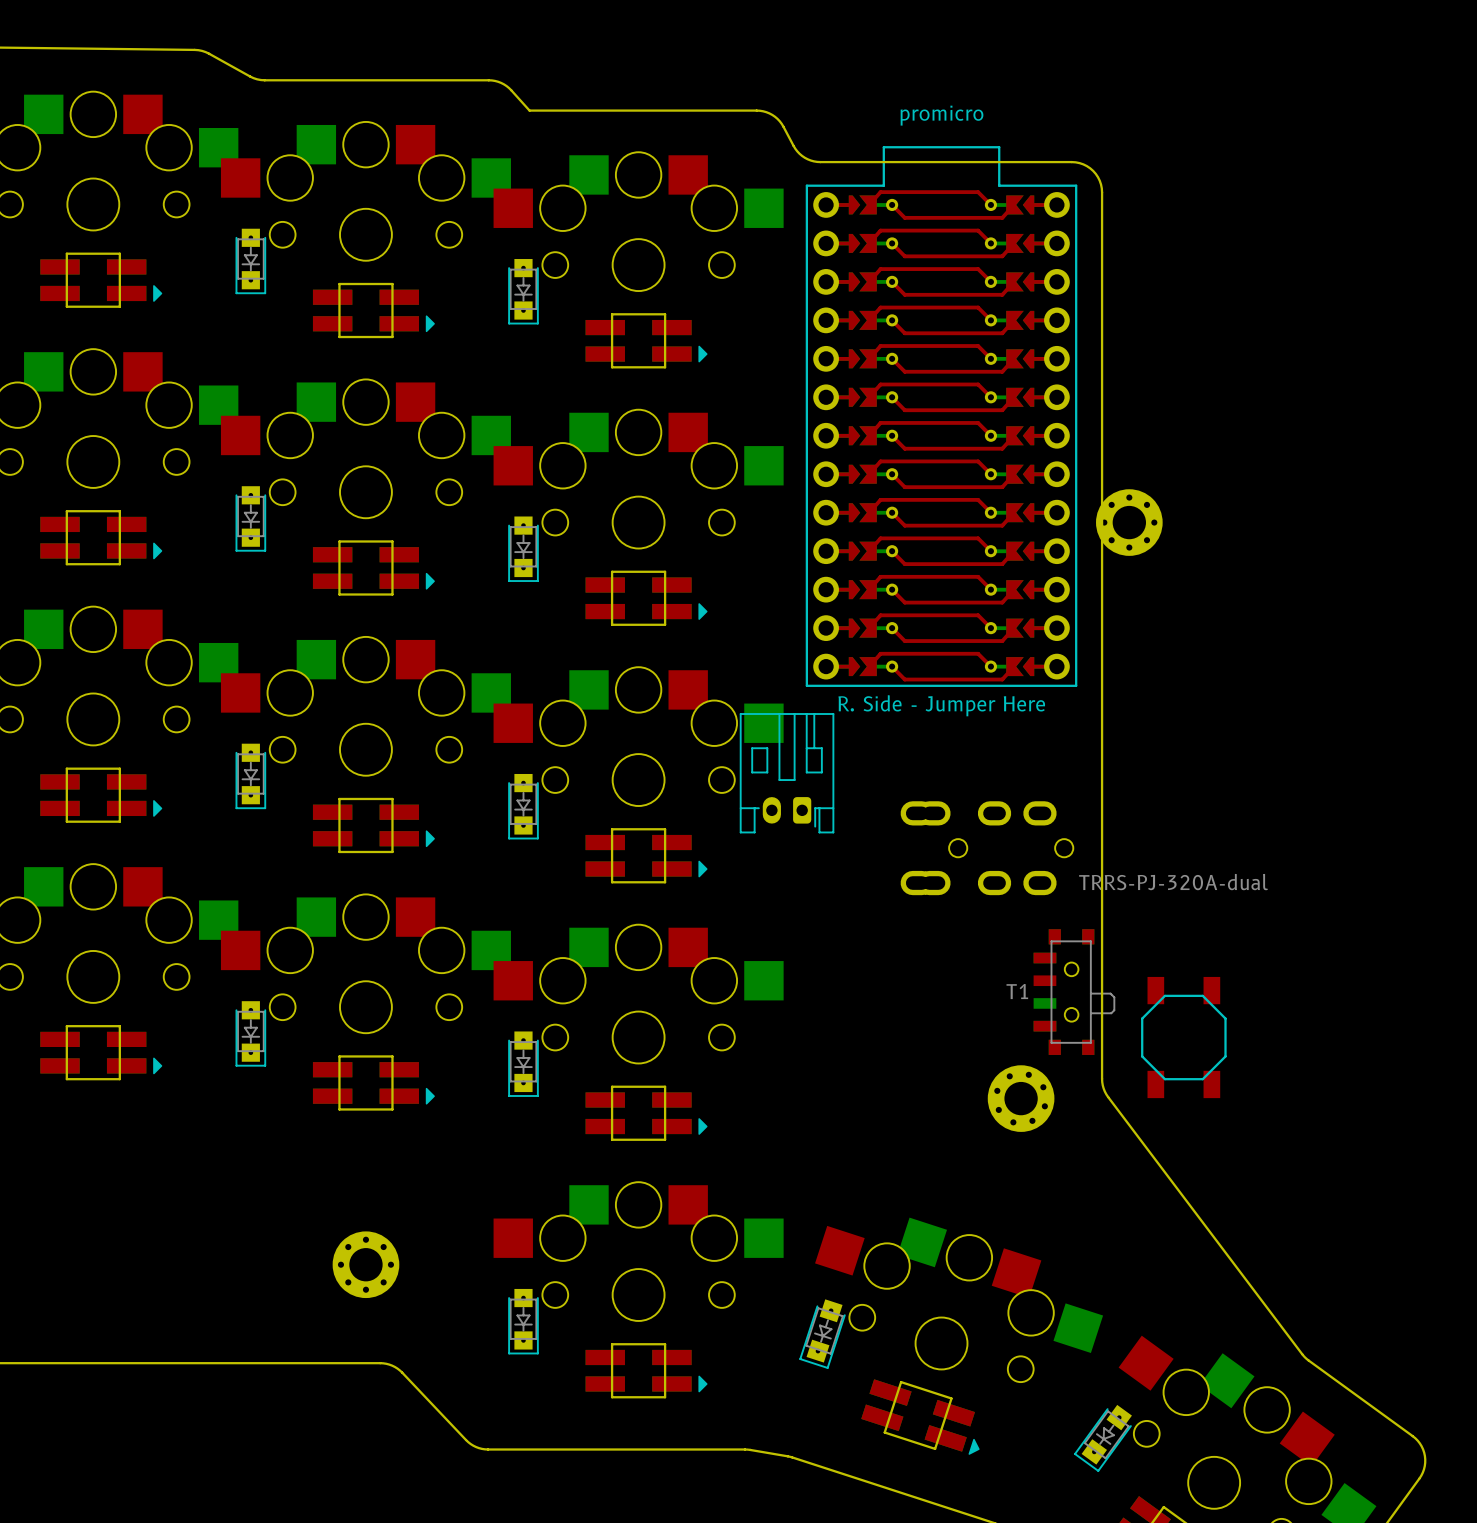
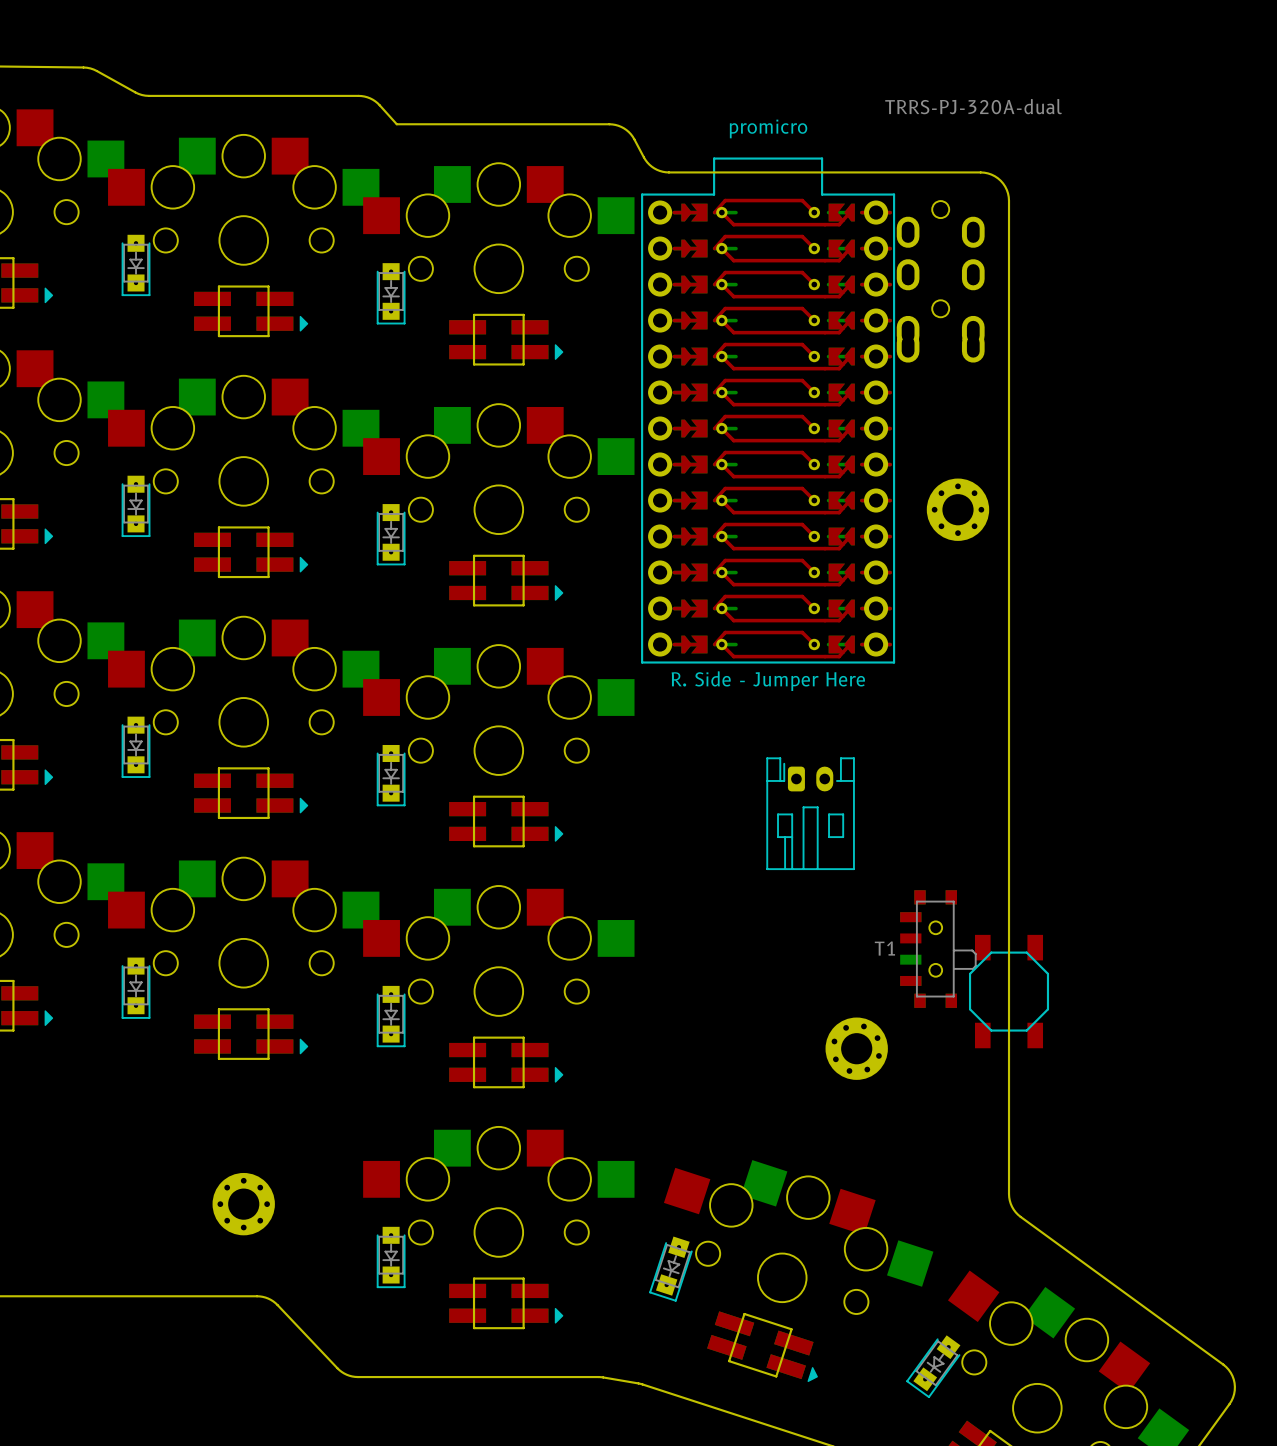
board edge: (1071, 162) (1083, 164) (1093, 170) (1099, 180) (1102, 192) (1102, 1085) (1108, 1097) (1303, 1355) (1417, 1440) (1423, 1449) (1425, 1459) (1423, 1469) (1419, 1478) -> (904, 172) (988, 173) (1000, 180) (1008, 197) (1009, 1200) (1013, 1209) (1020, 1216) (1226, 1366) (1234, 1383) (1234, 1394) (1229, 1404)
top track: (962, 192) (978, 192) (991, 205) -> (802, 200) (814, 212)
top track: (892, 205) (904, 217) -> (721, 212) (733, 224) (747, 224)
top track: (962, 230) (978, 230) (991, 243) -> (802, 236) (814, 248)
top track: (892, 243) (904, 256) -> (721, 248) (733, 260) (747, 260)
top track: (962, 269) (978, 269) (991, 281) -> (802, 272) (814, 284)
part: none -> TRRS-PJ-320A-dual (940, 281)
top track: (892, 281) (904, 294) -> (721, 284) (733, 296) (747, 296)
top track: (962, 307) (978, 307) (991, 320) -> (802, 308) (814, 320)
top track: (892, 320) (904, 333) -> (721, 320) (733, 332) (747, 332)
top track: (962, 346) (978, 346) (991, 358) -> (802, 344) (814, 356)
top track: (892, 358) (904, 371) -> (721, 356) (733, 368) (747, 368)
top track: (962, 384) (978, 384) (991, 397) -> (802, 380) (814, 392)
top track: (892, 397) (904, 410) -> (721, 392) (733, 404) (747, 404)
part position: (941, 416) -> (768, 410)
top track: (962, 422) (978, 422) (991, 435) -> (802, 416) (814, 428)
top track: (892, 435) (904, 448) -> (721, 428) (733, 440) (747, 440)
top track: (962, 461) (978, 461) (991, 474) -> (802, 452) (814, 464)
top track: (892, 474) (904, 487) -> (721, 464) (733, 476) (747, 476)
top track: (962, 499) (978, 499) (991, 512) -> (802, 488) (814, 500)
top track: (892, 512) (904, 525) -> (721, 500) (733, 512) (747, 512)
top track: (962, 538) (978, 538) (991, 551) -> (802, 524) (814, 536)
top track: (892, 551) (904, 564) -> (721, 536) (733, 548) (747, 548)
top track: (962, 576) (978, 576) (991, 589) -> (802, 560) (814, 572)
top track: (892, 589) (904, 602) -> (721, 572) (733, 584) (747, 584)
top track: (962, 615) (978, 615) (991, 628) -> (802, 596) (814, 608)
top track: (892, 628) (904, 641) -> (721, 608) (733, 620) (747, 620)
top track: (962, 653) (978, 653) (991, 666) -> (802, 632) (814, 644)
top track: (892, 666) (904, 679) -> (721, 644) (733, 656) (747, 656)
part rotation: 0° (787, 773) -> 180° (810, 813)
part position: (787, 773) -> (810, 813)
part: TRRS-PJ-320A-dual (986, 848) -> none
T1 position: (1074, 992) -> (938, 949)

